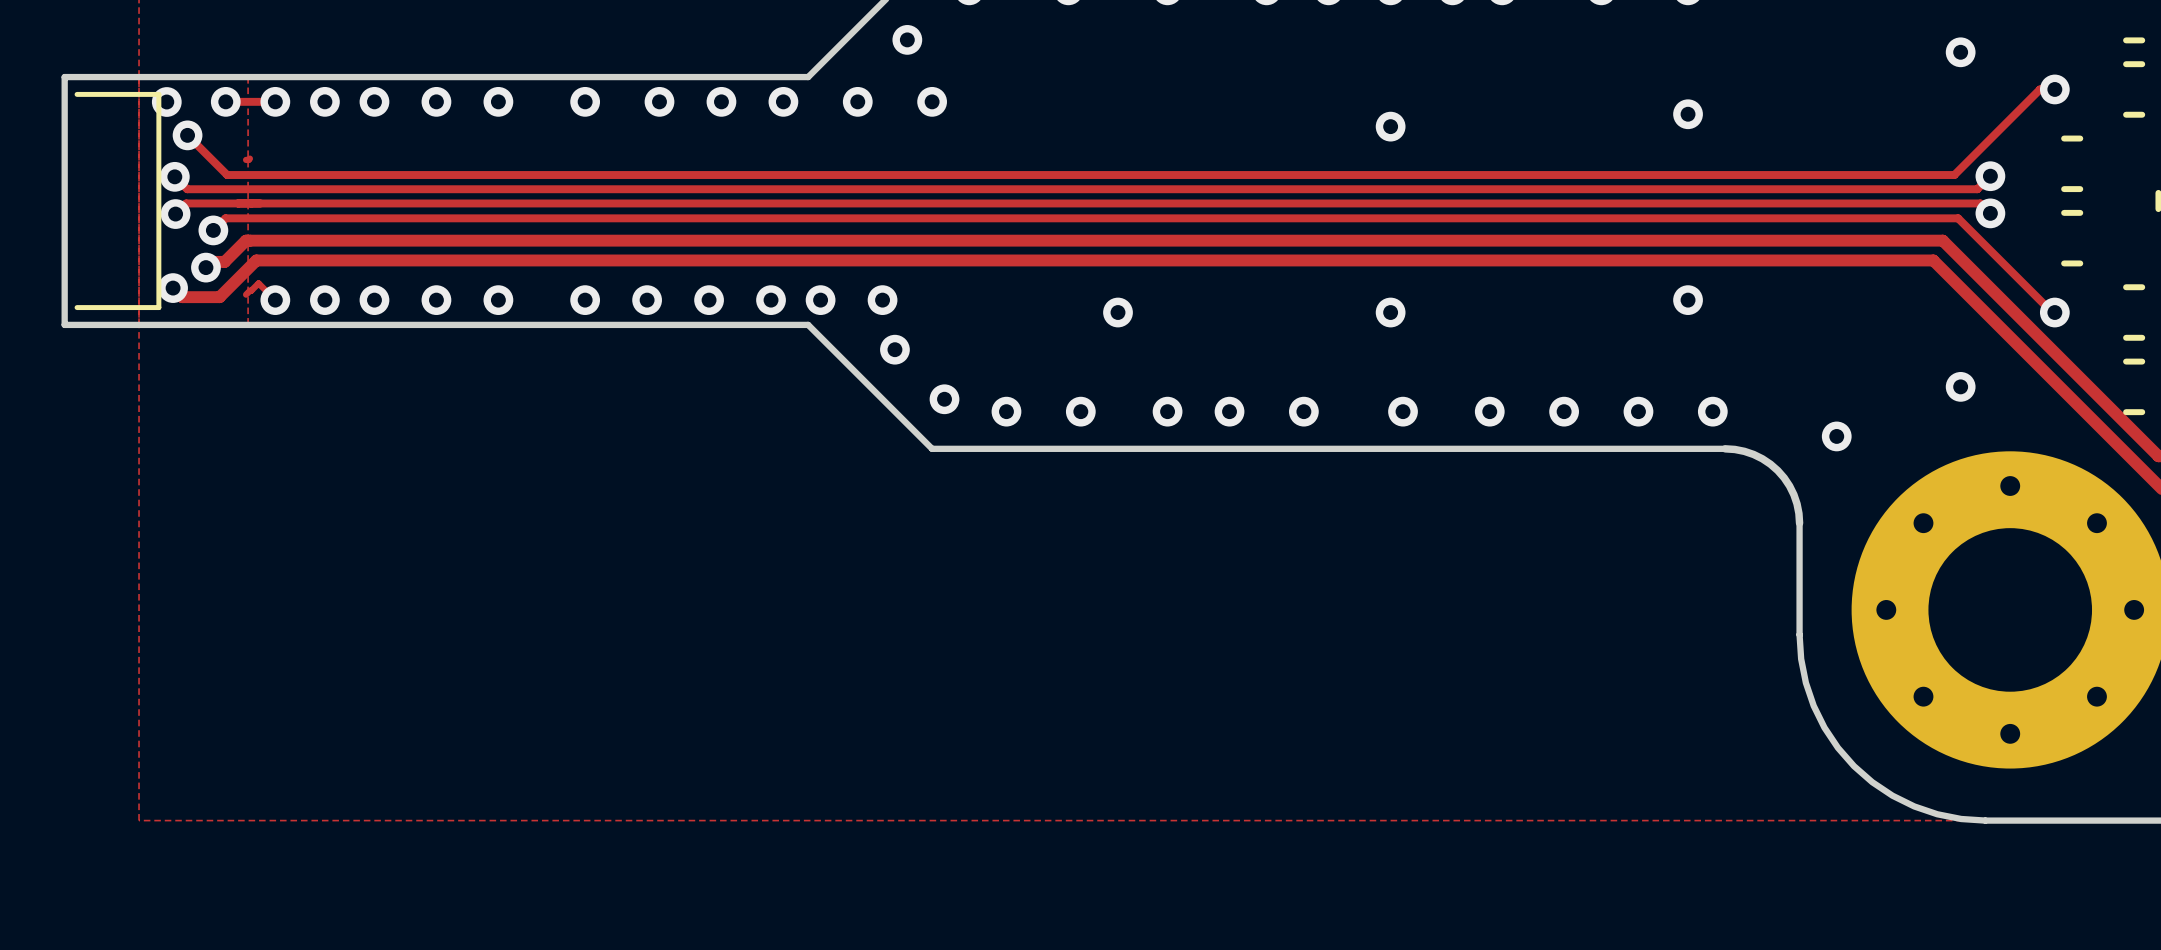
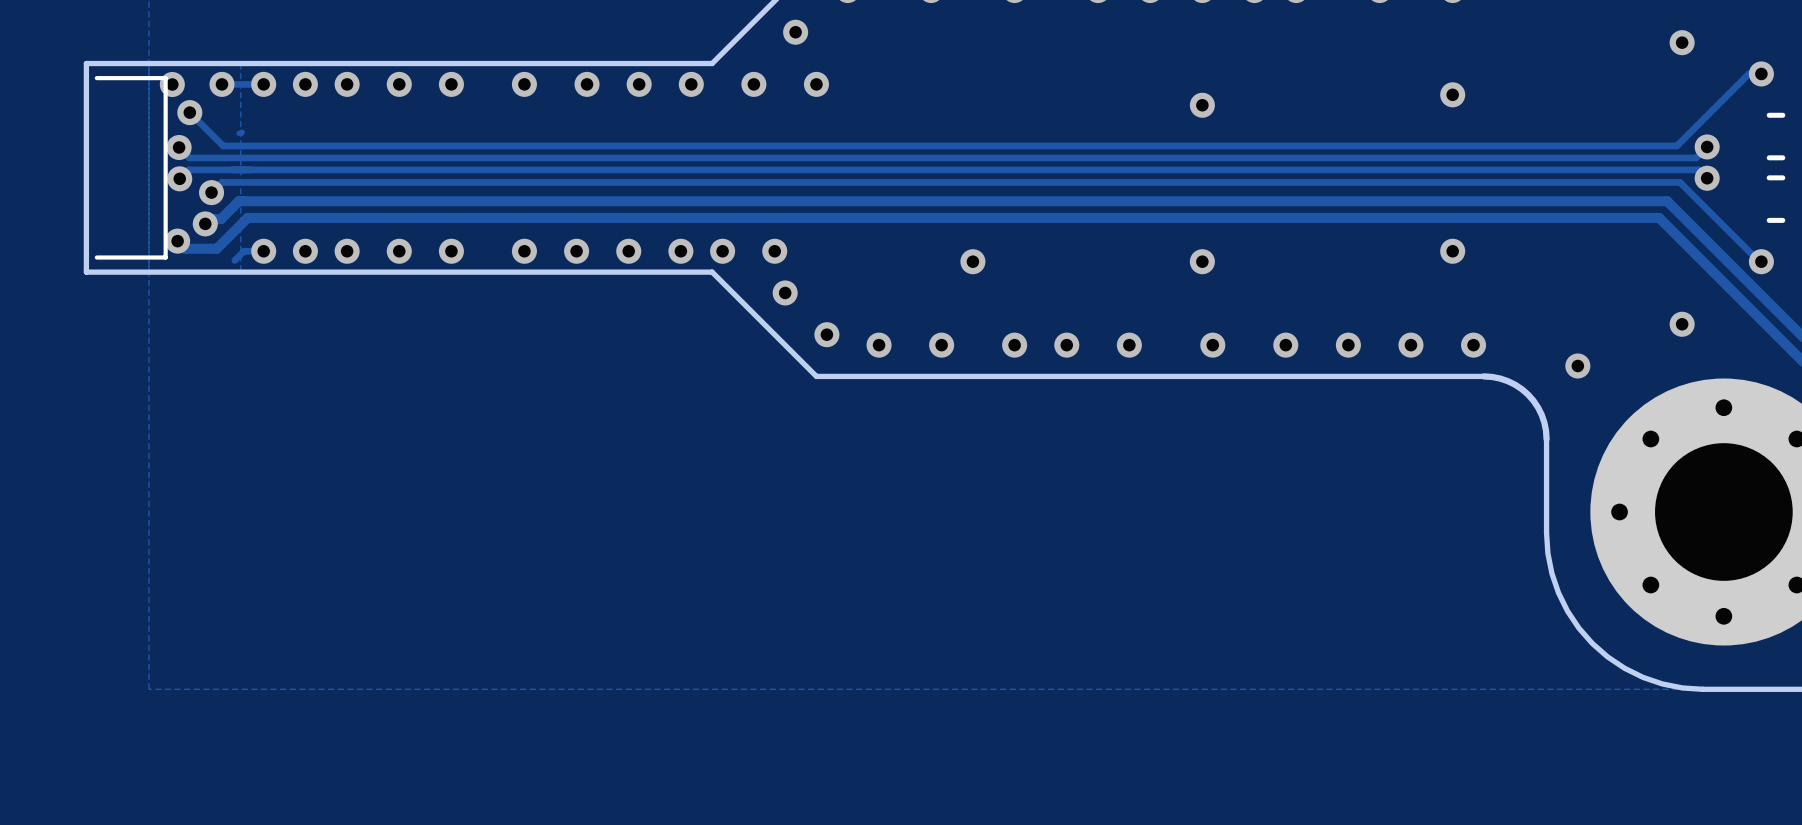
track: (246, 294) (258, 283) (275, 300) -> (234, 260) (244, 251) (263, 251)

